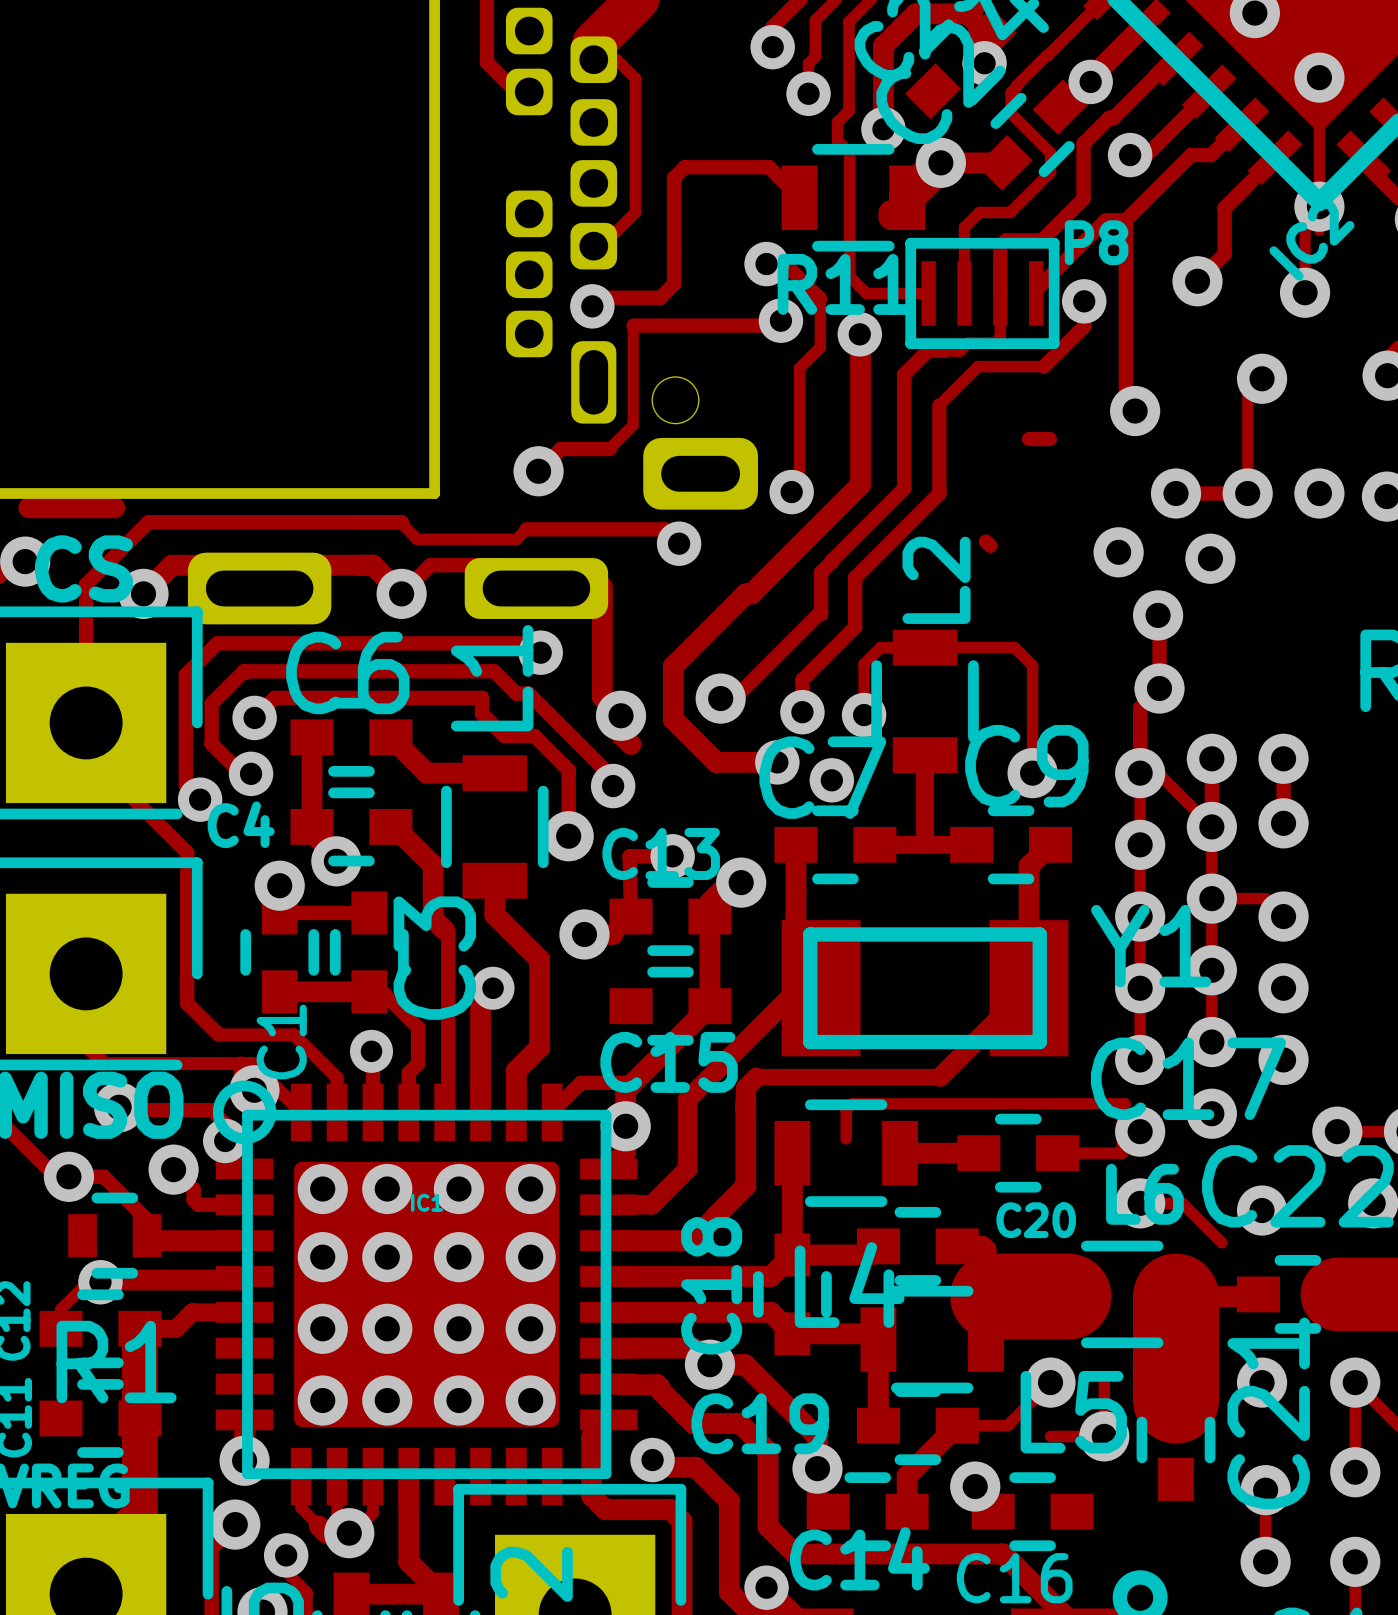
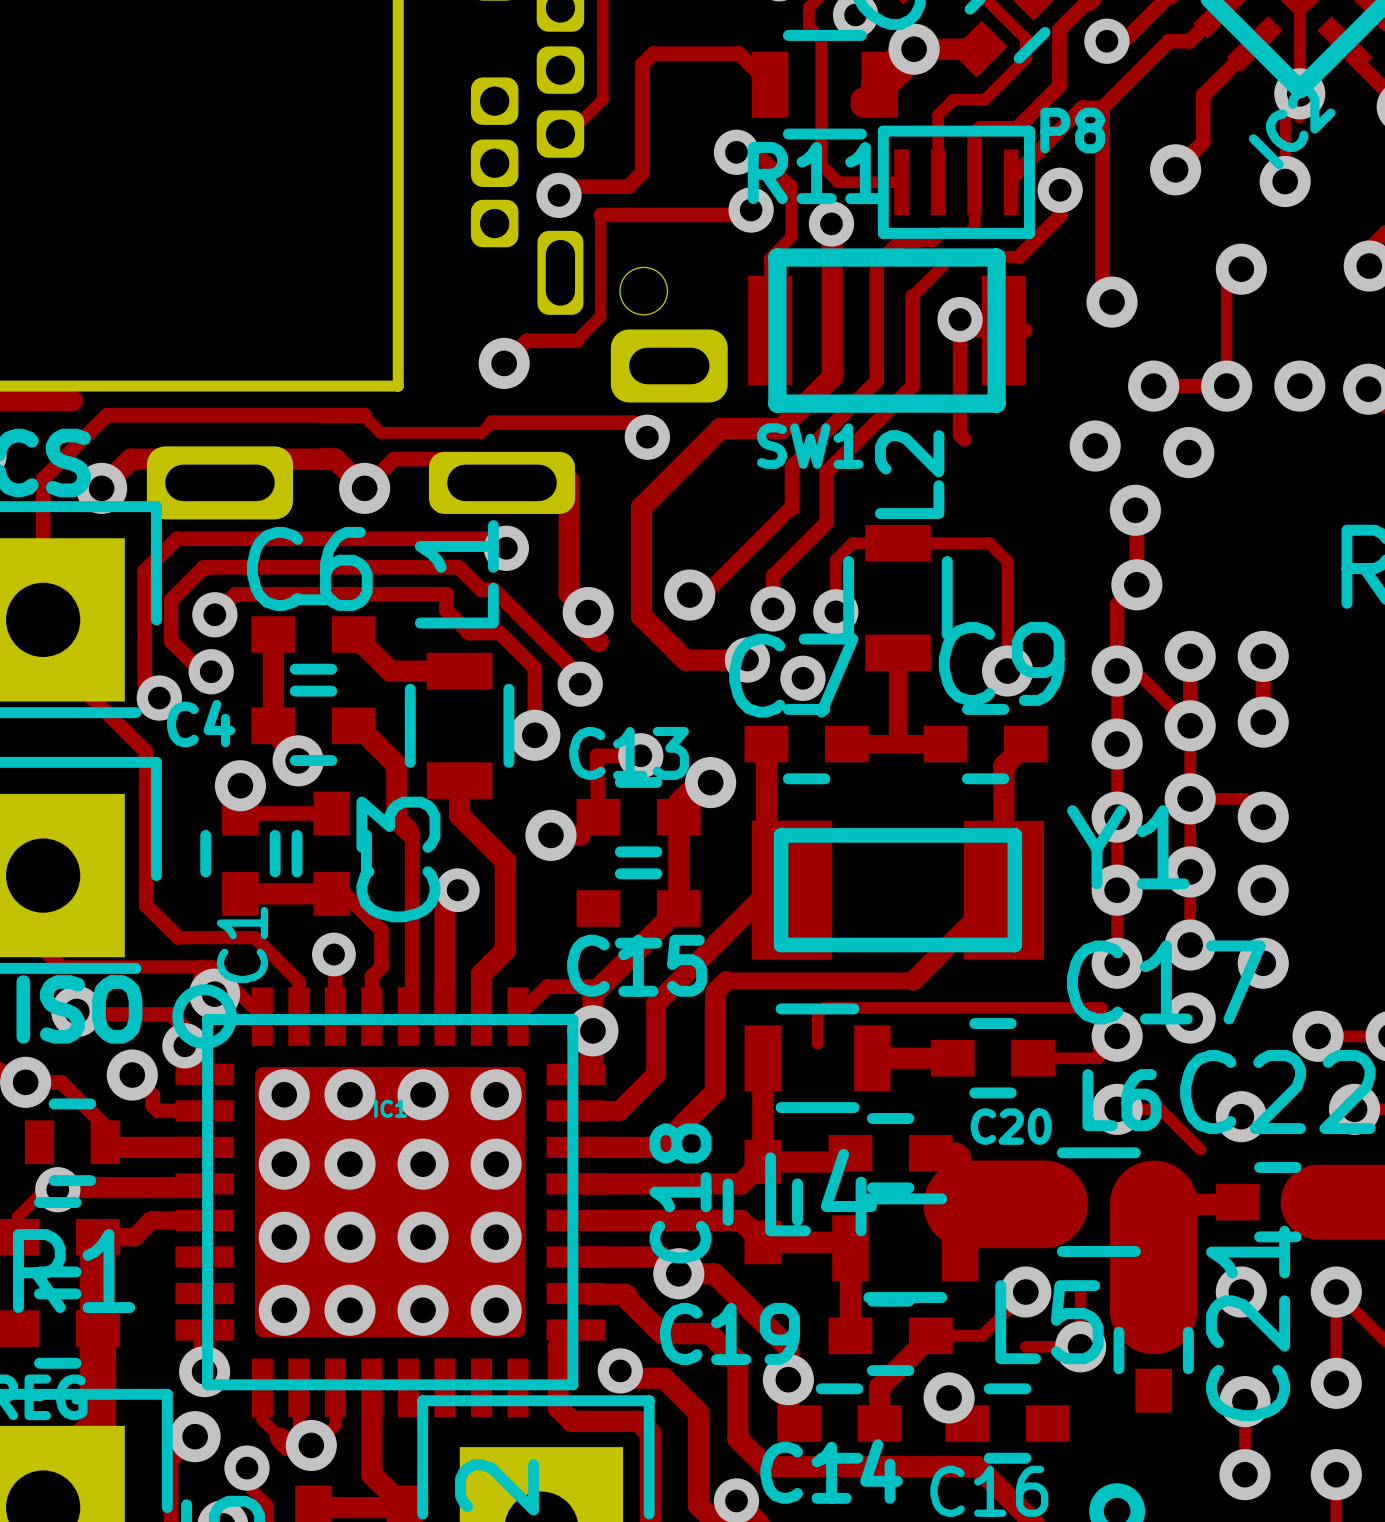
track: (799, 439) (799, 484) (791, 492) -> none
SW1: none -> (887, 330)
track: none -> (1003, 330) (971, 330) (960, 319) (960, 435)
via position: (791, 492) -> (960, 319)
track: (810, 535) (751, 593) (745, 593) (673, 666) -> (781, 428) (720, 428) (641, 507) (641, 562)

